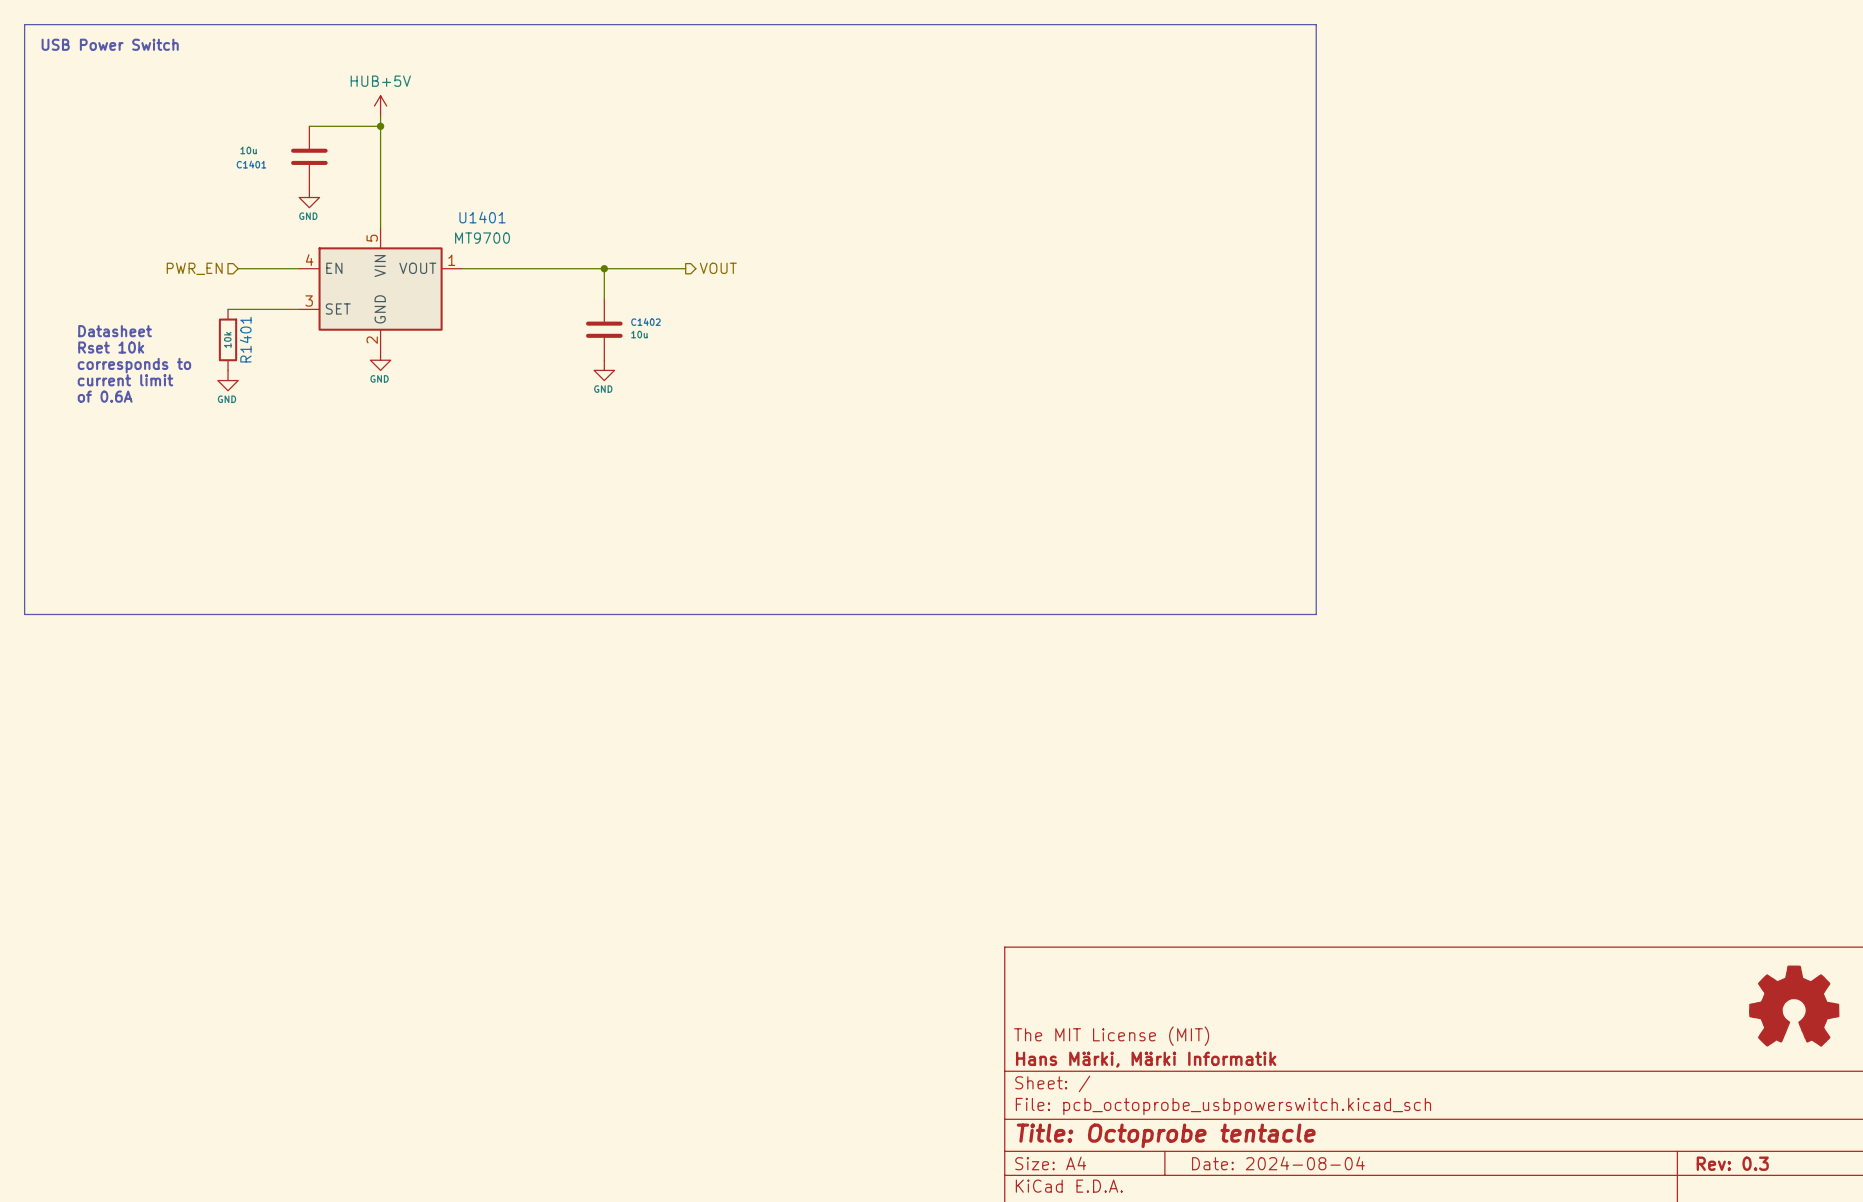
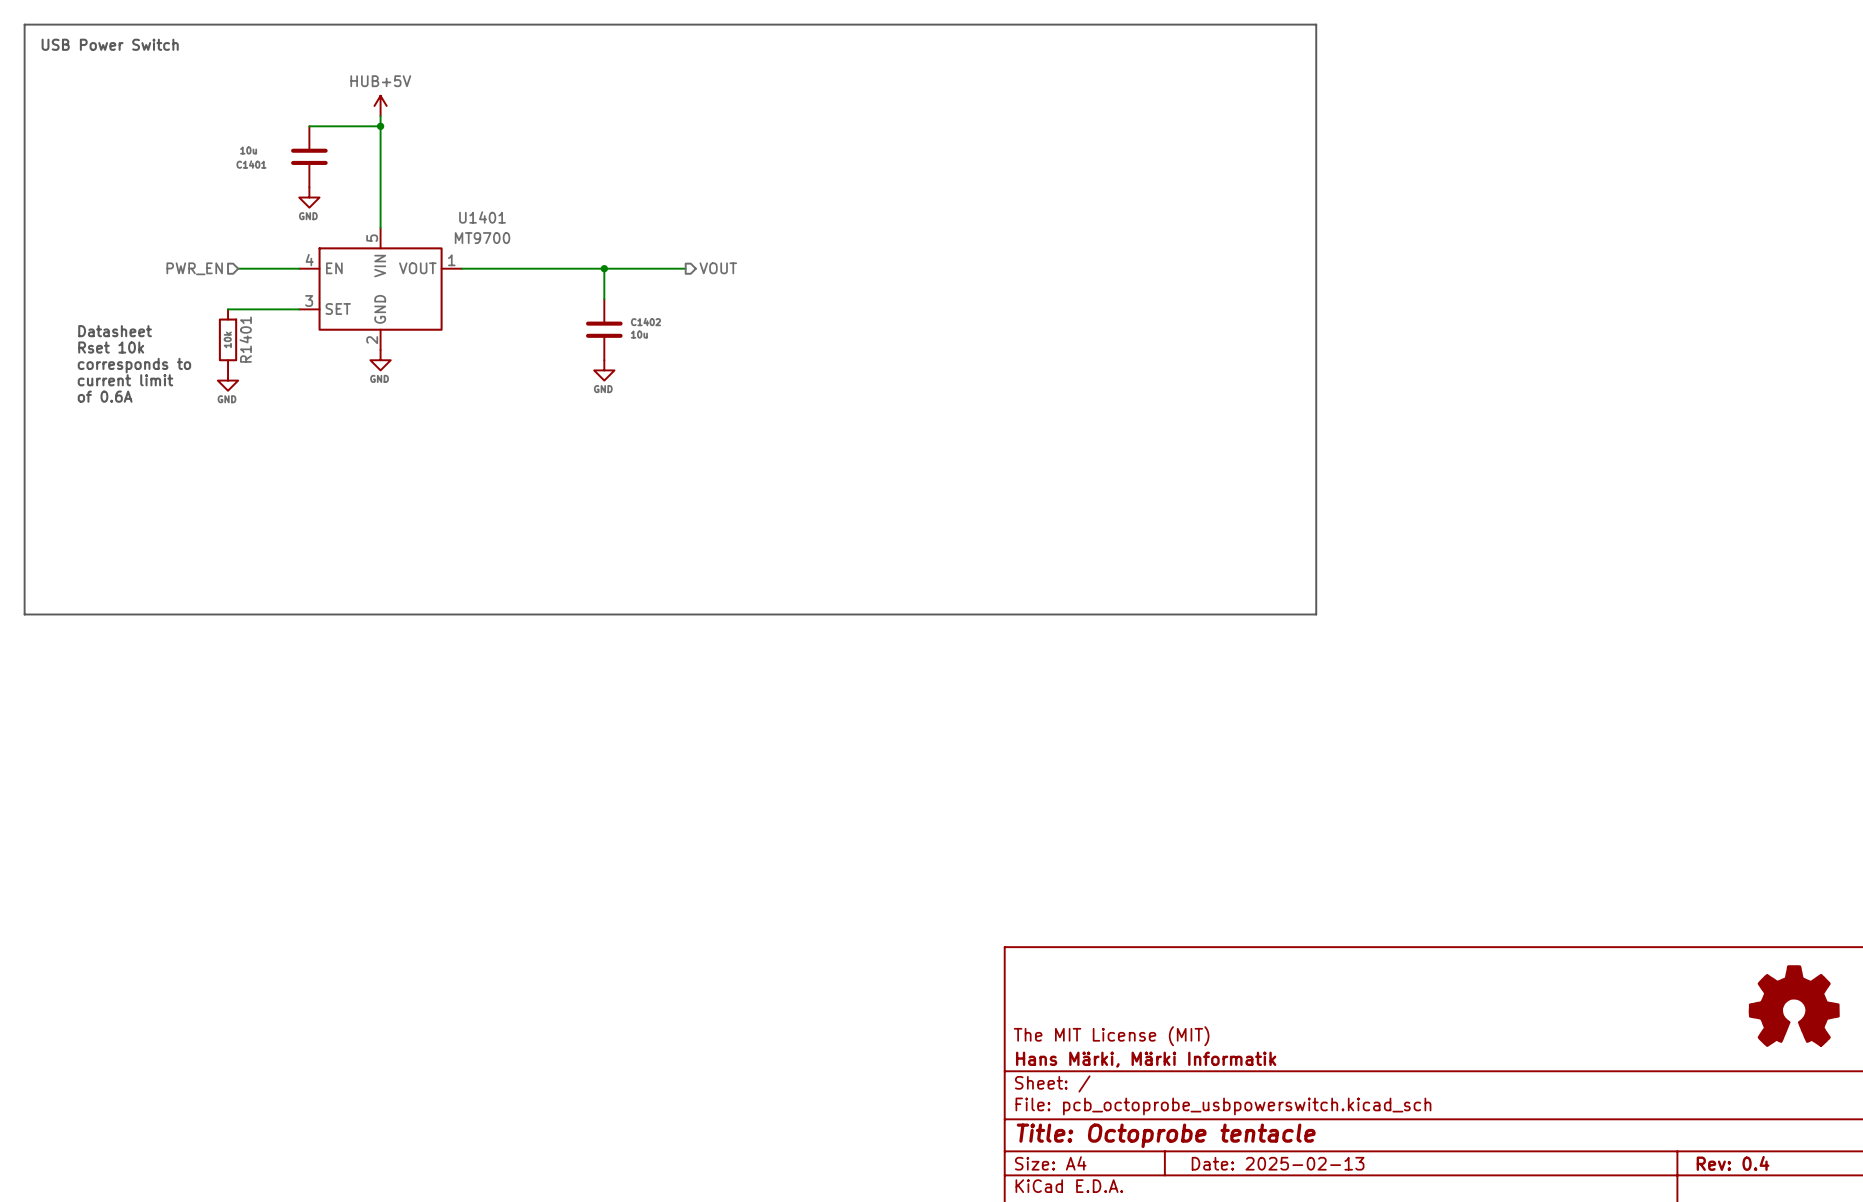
title block: Date: 2024-08-04 (1278, 1163) -> Date: 2025-02-13 (1278, 1163)
title block: Rev: 0.3 (1732, 1163) -> Rev: 0.4 (1733, 1163)

